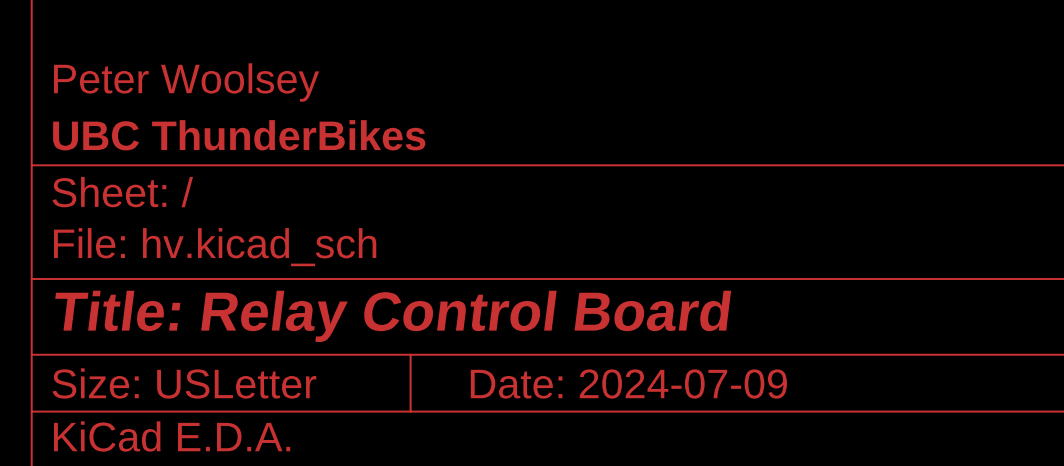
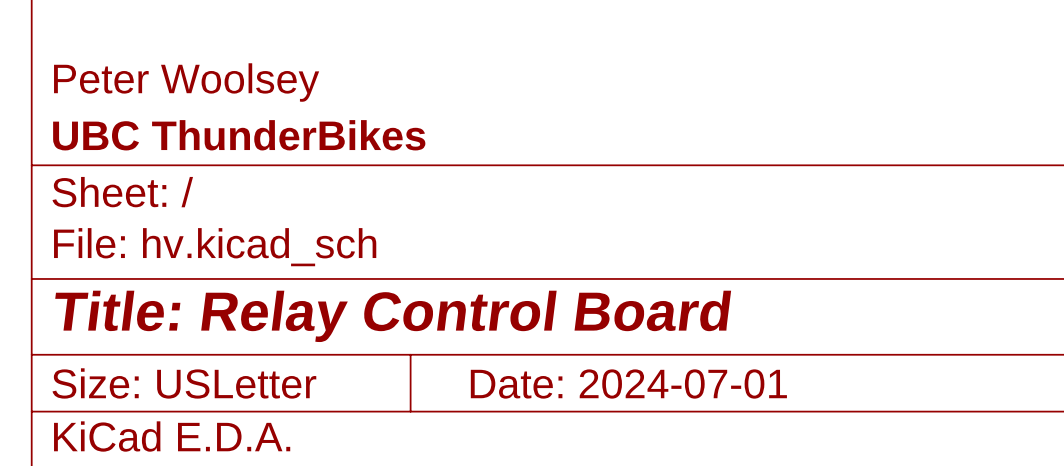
title block: Date: 2024-07-09 (628, 384) -> Date: 2024-07-01 (628, 384)

